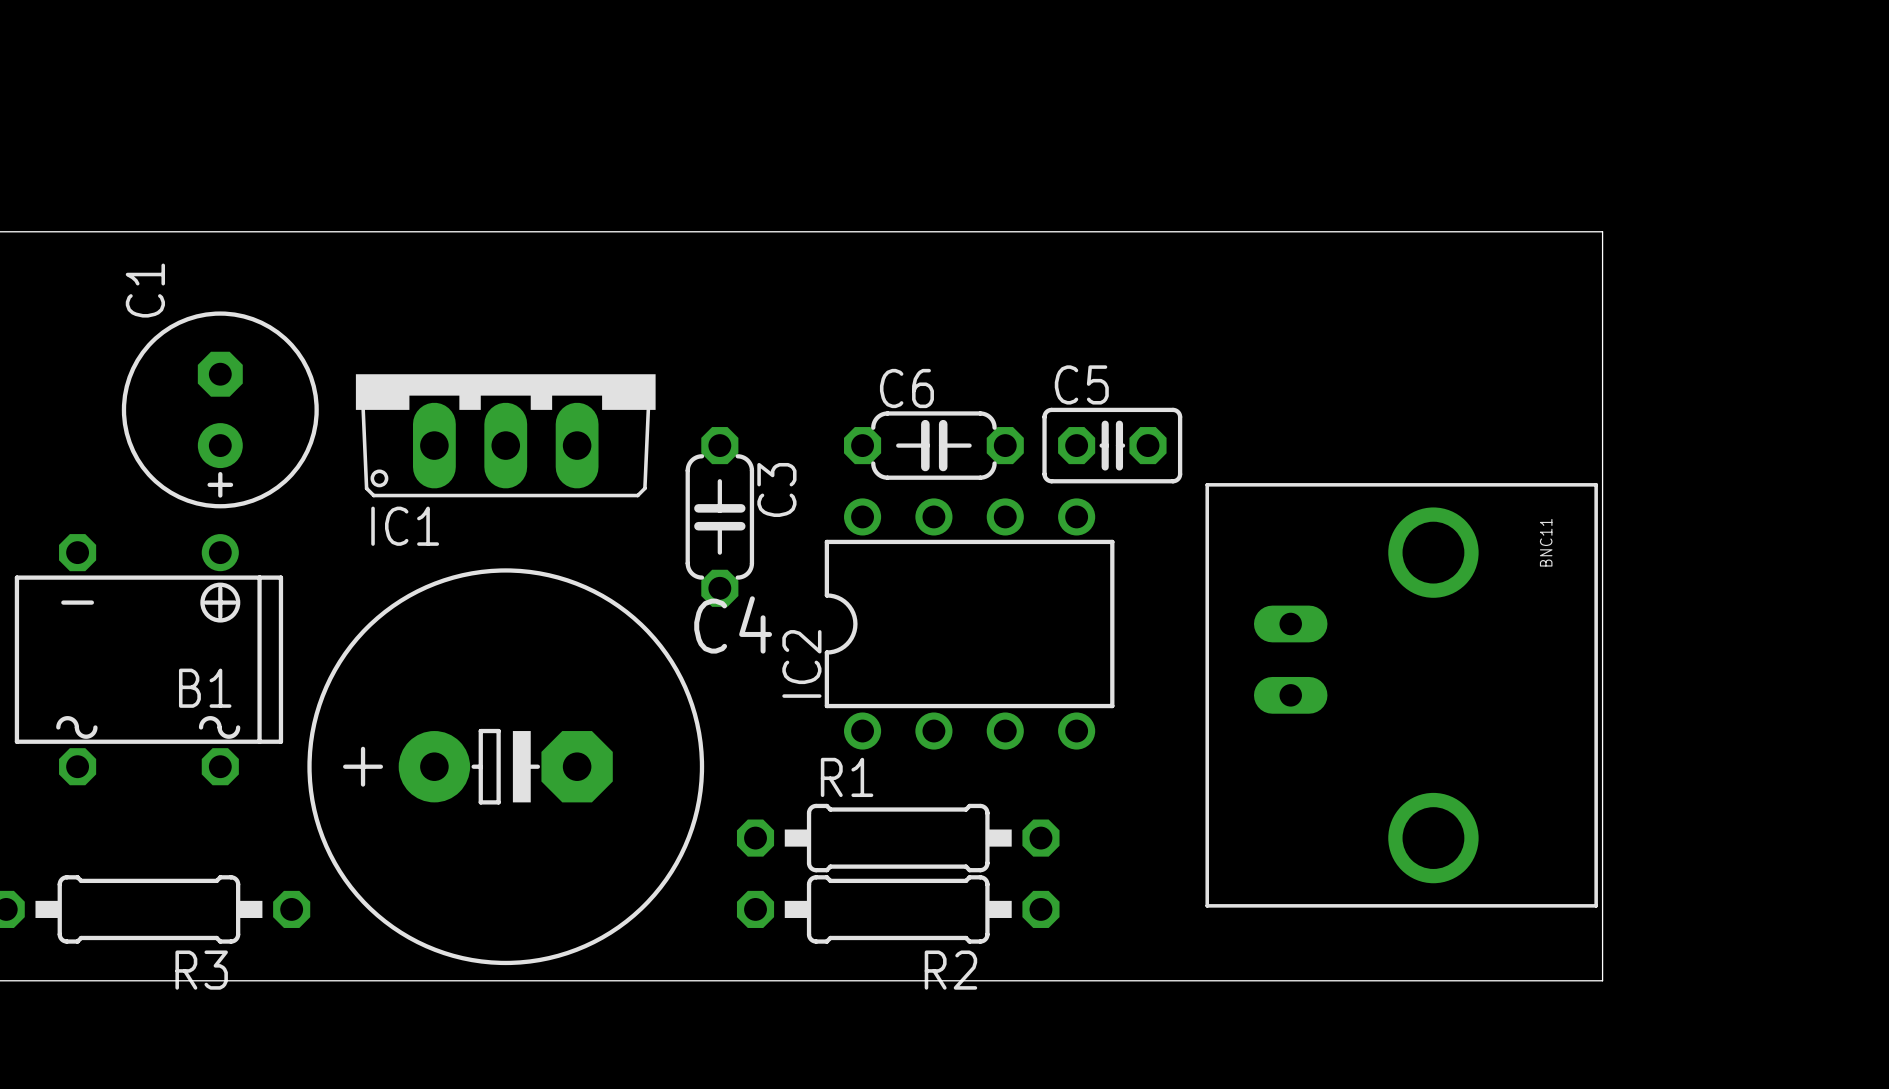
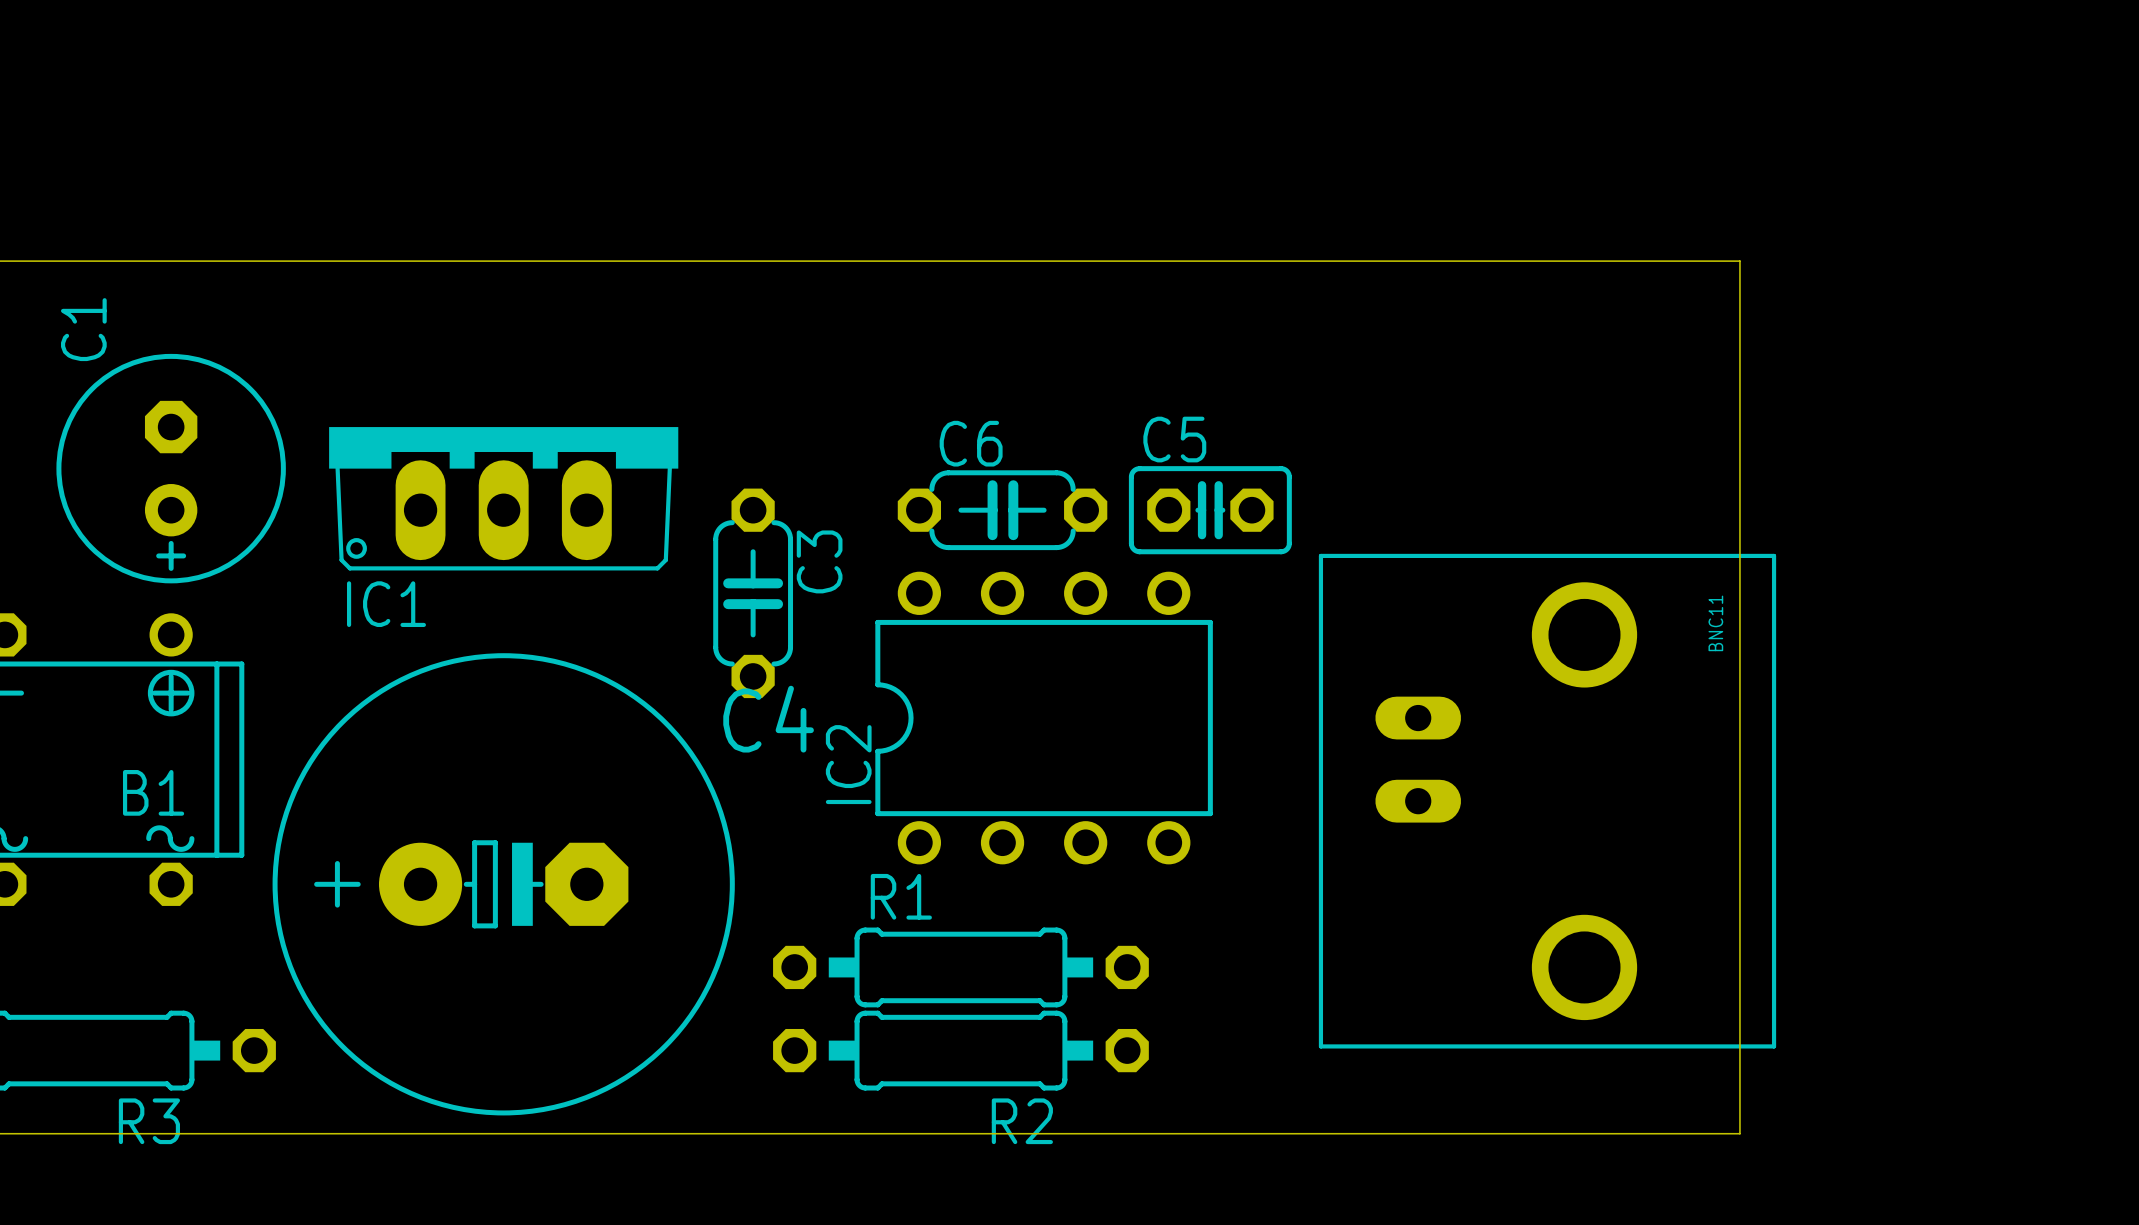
board edge: (1566, 231) (1602, 231) (1602, 980) (1566, 980) -> (1739, 261) (1739, 1133)

